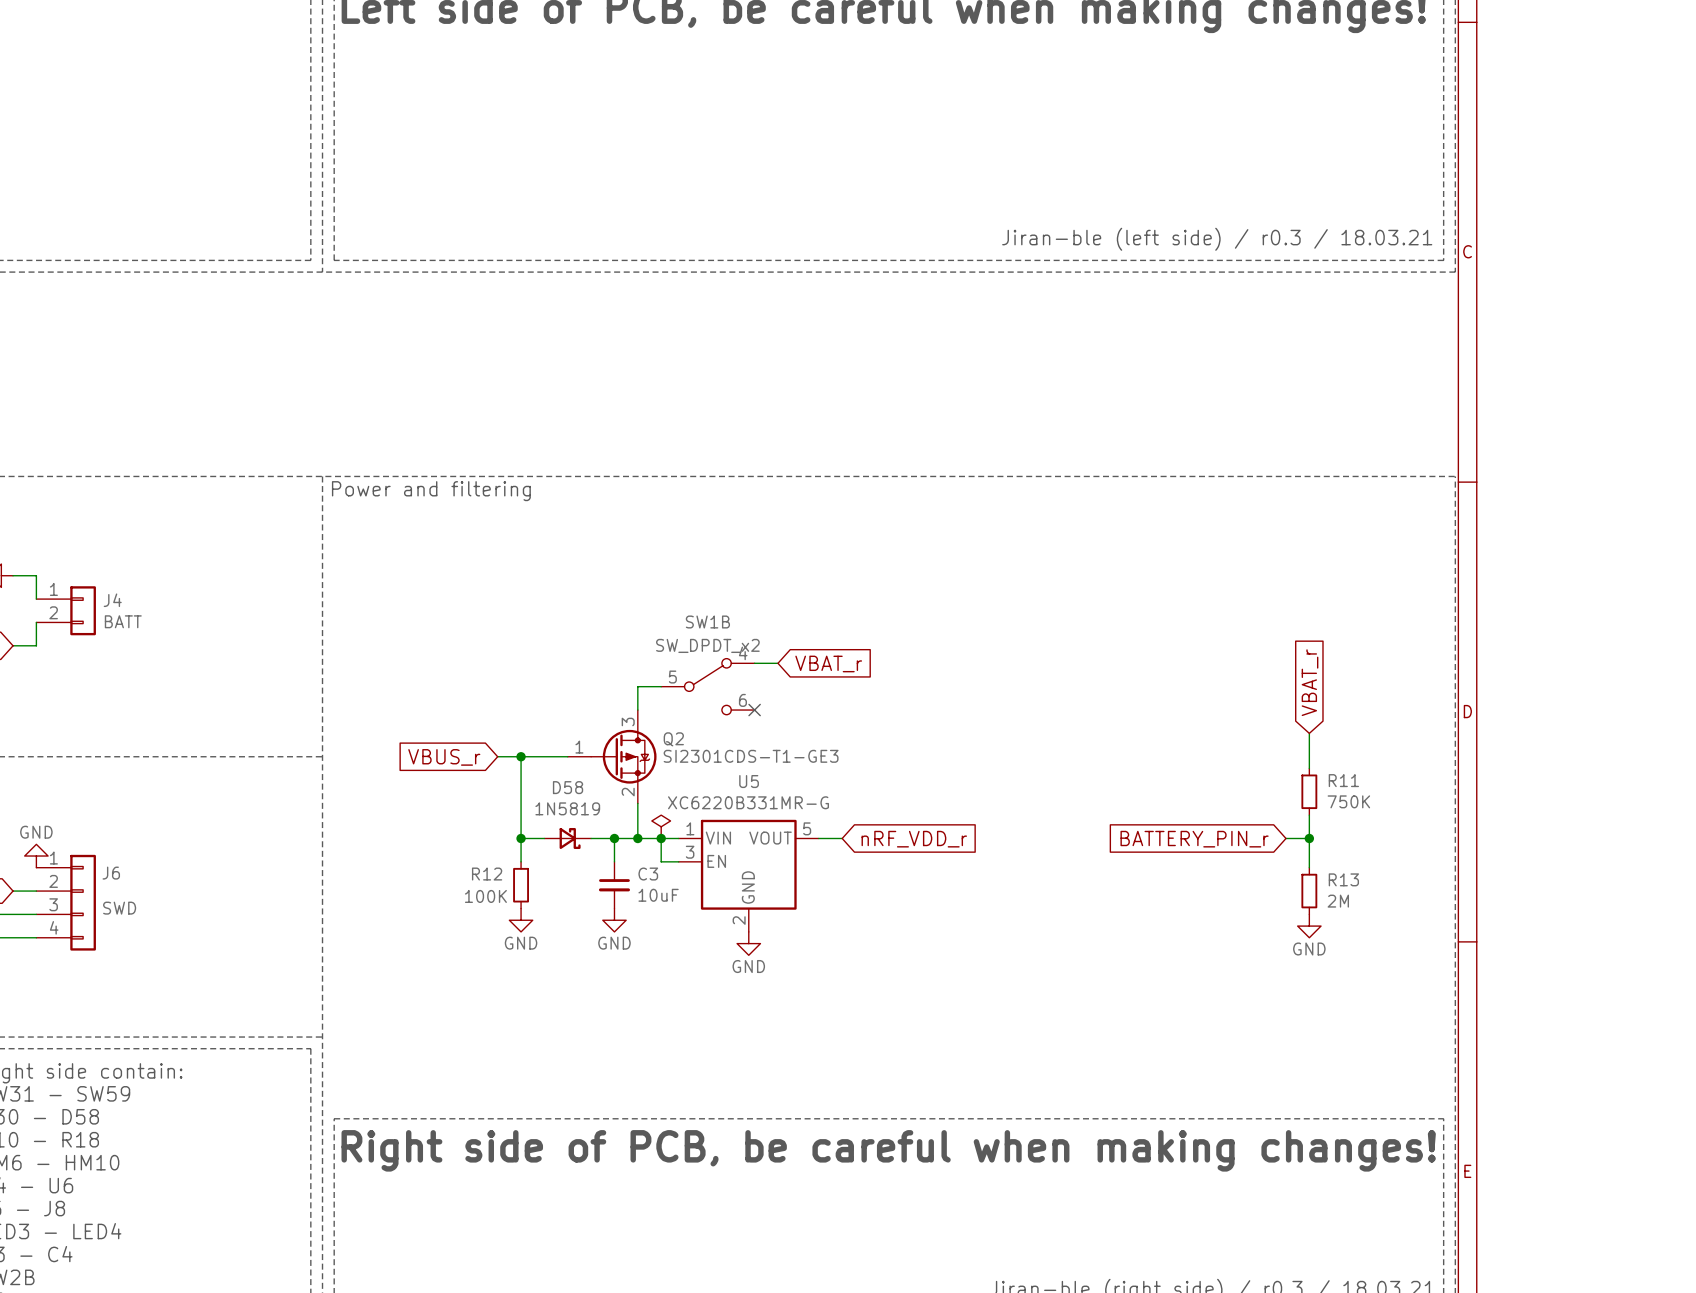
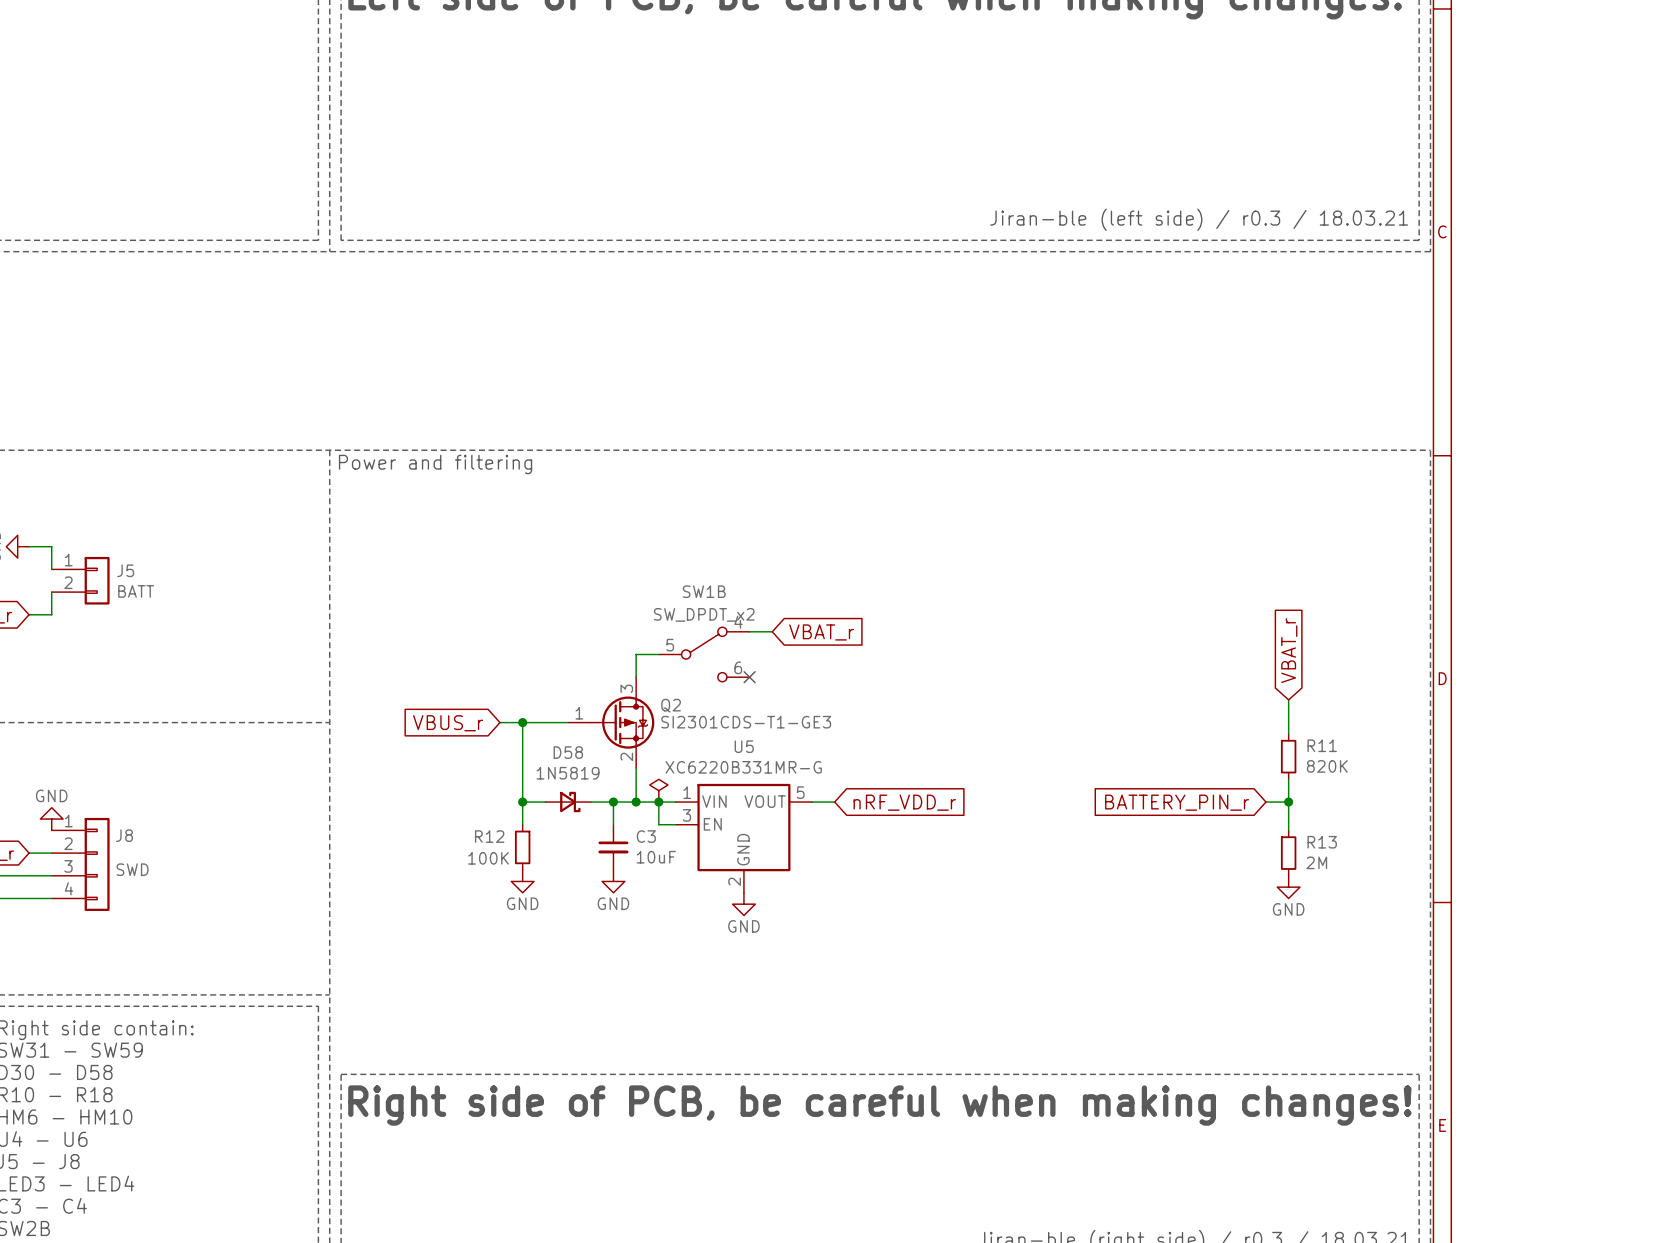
J4 name: J4 (112, 600) -> J5 (125, 570)
R11 value: 750K (1348, 801) -> 820K (1327, 766)
J6 name: J6 (111, 873) -> J8 (124, 835)

